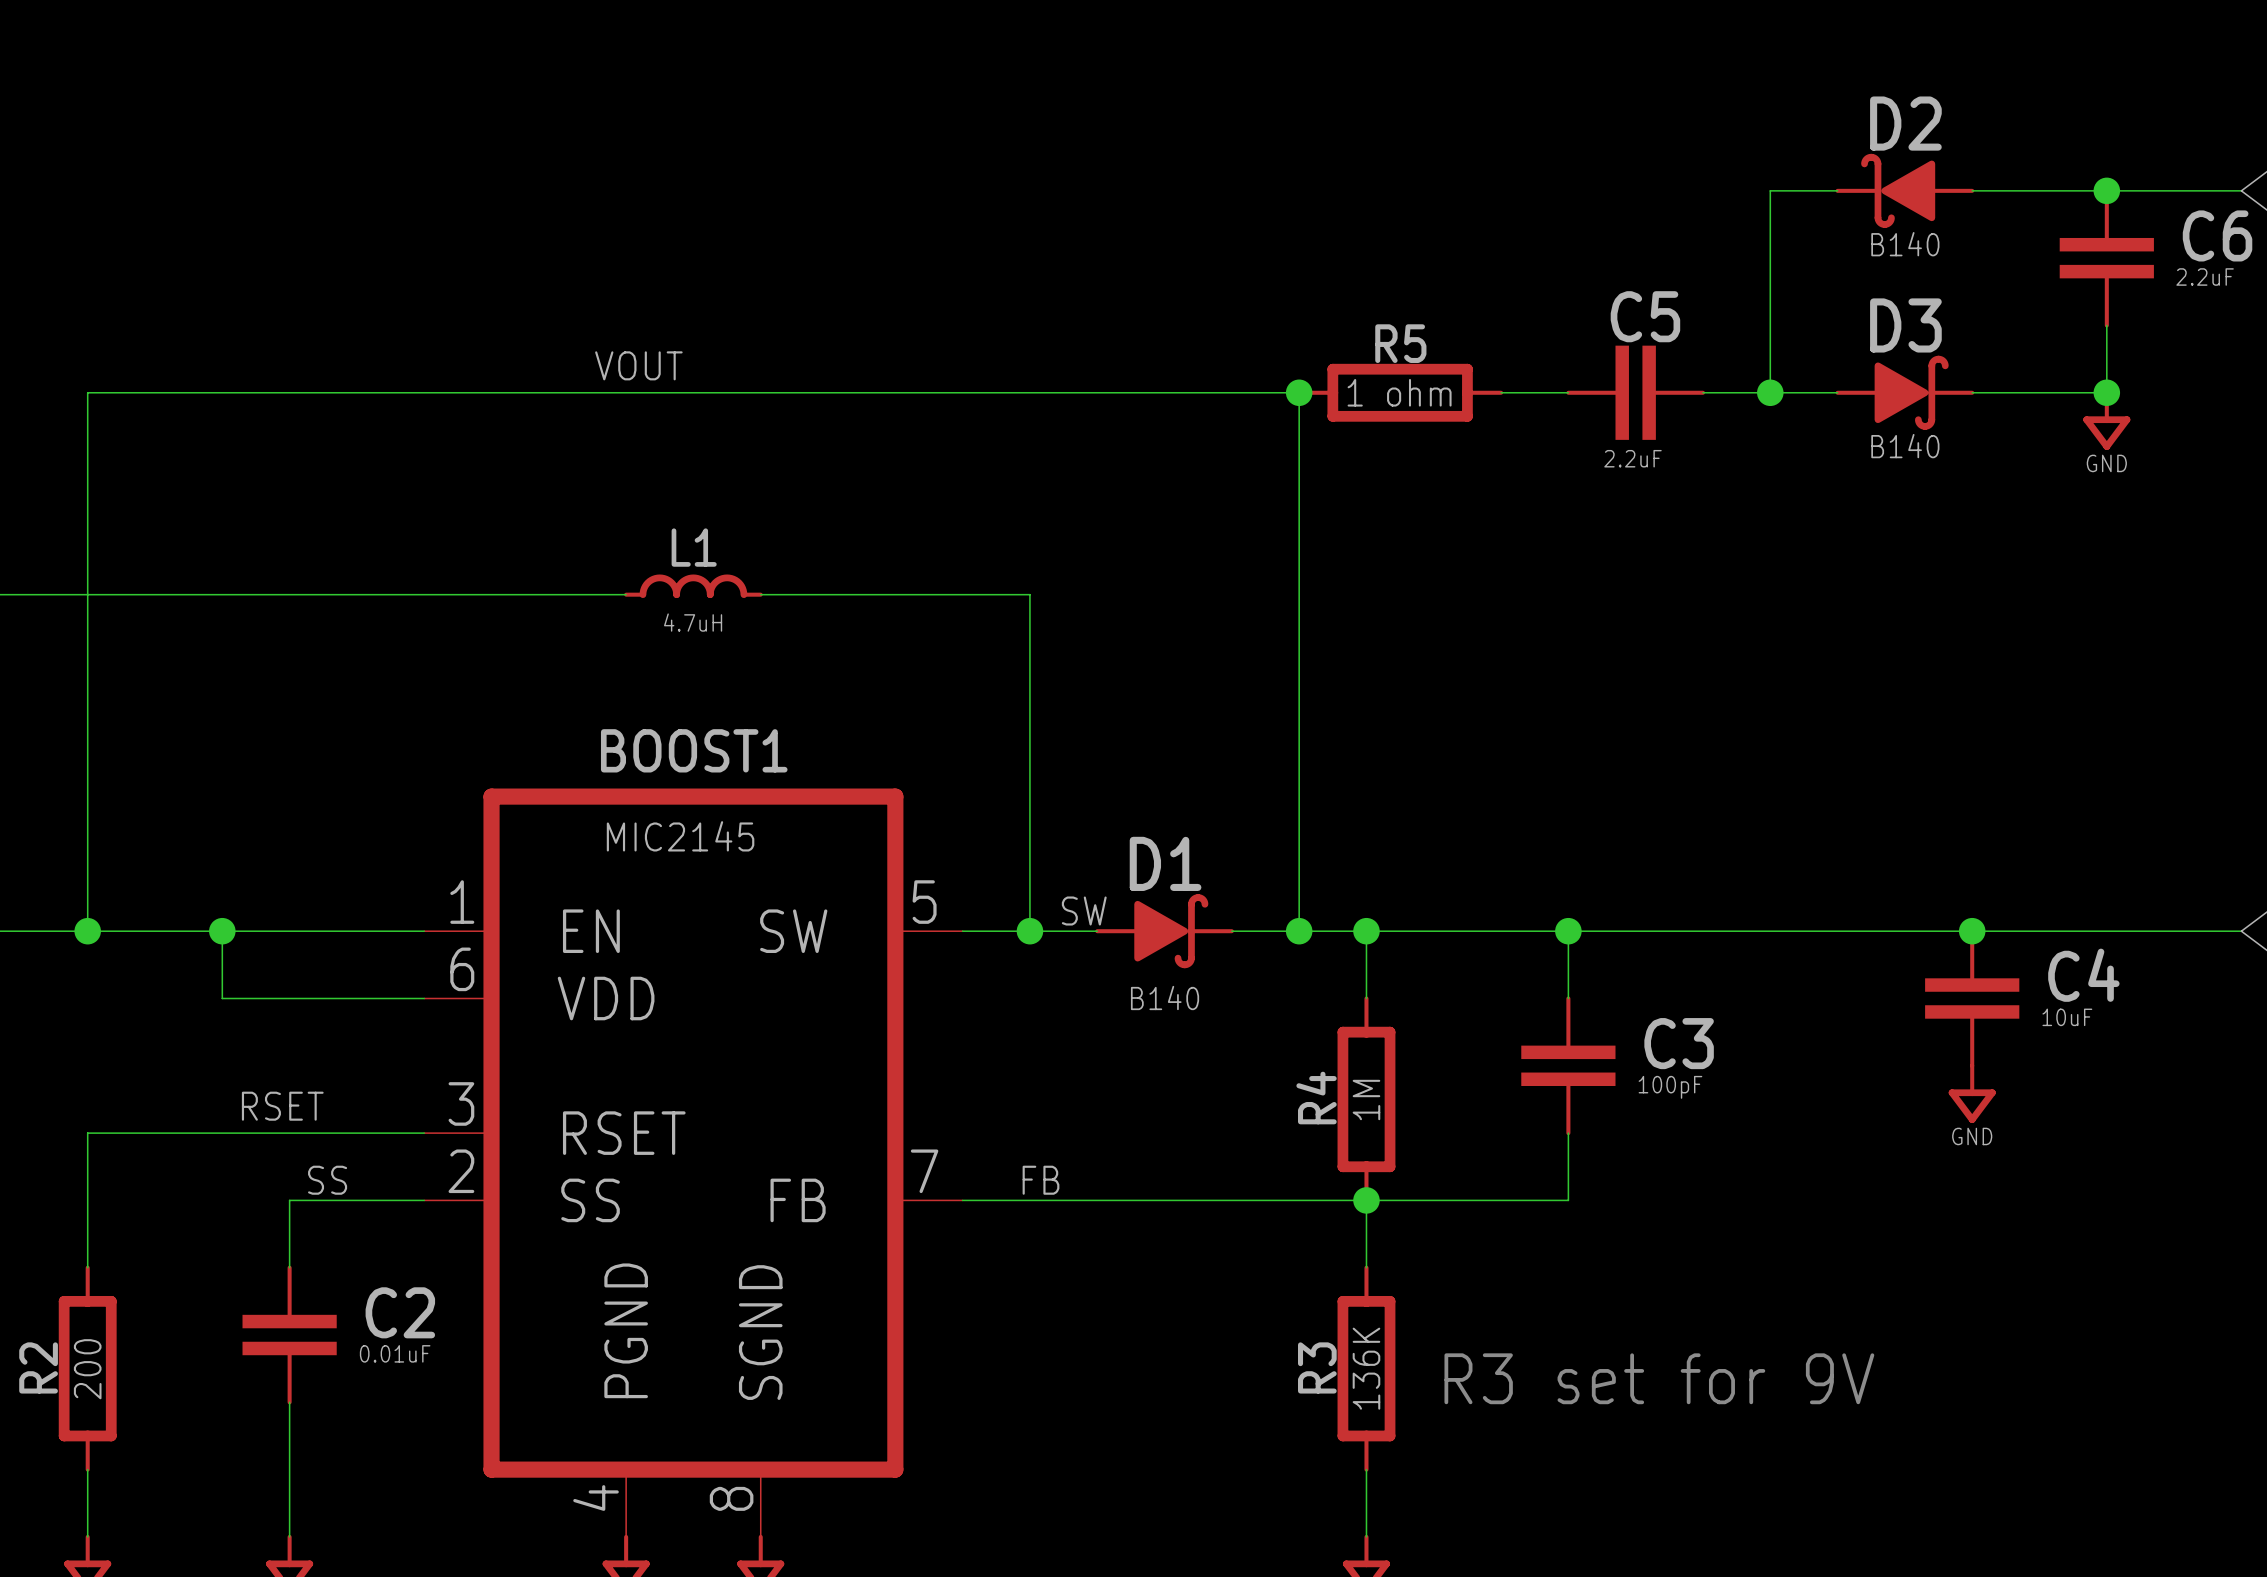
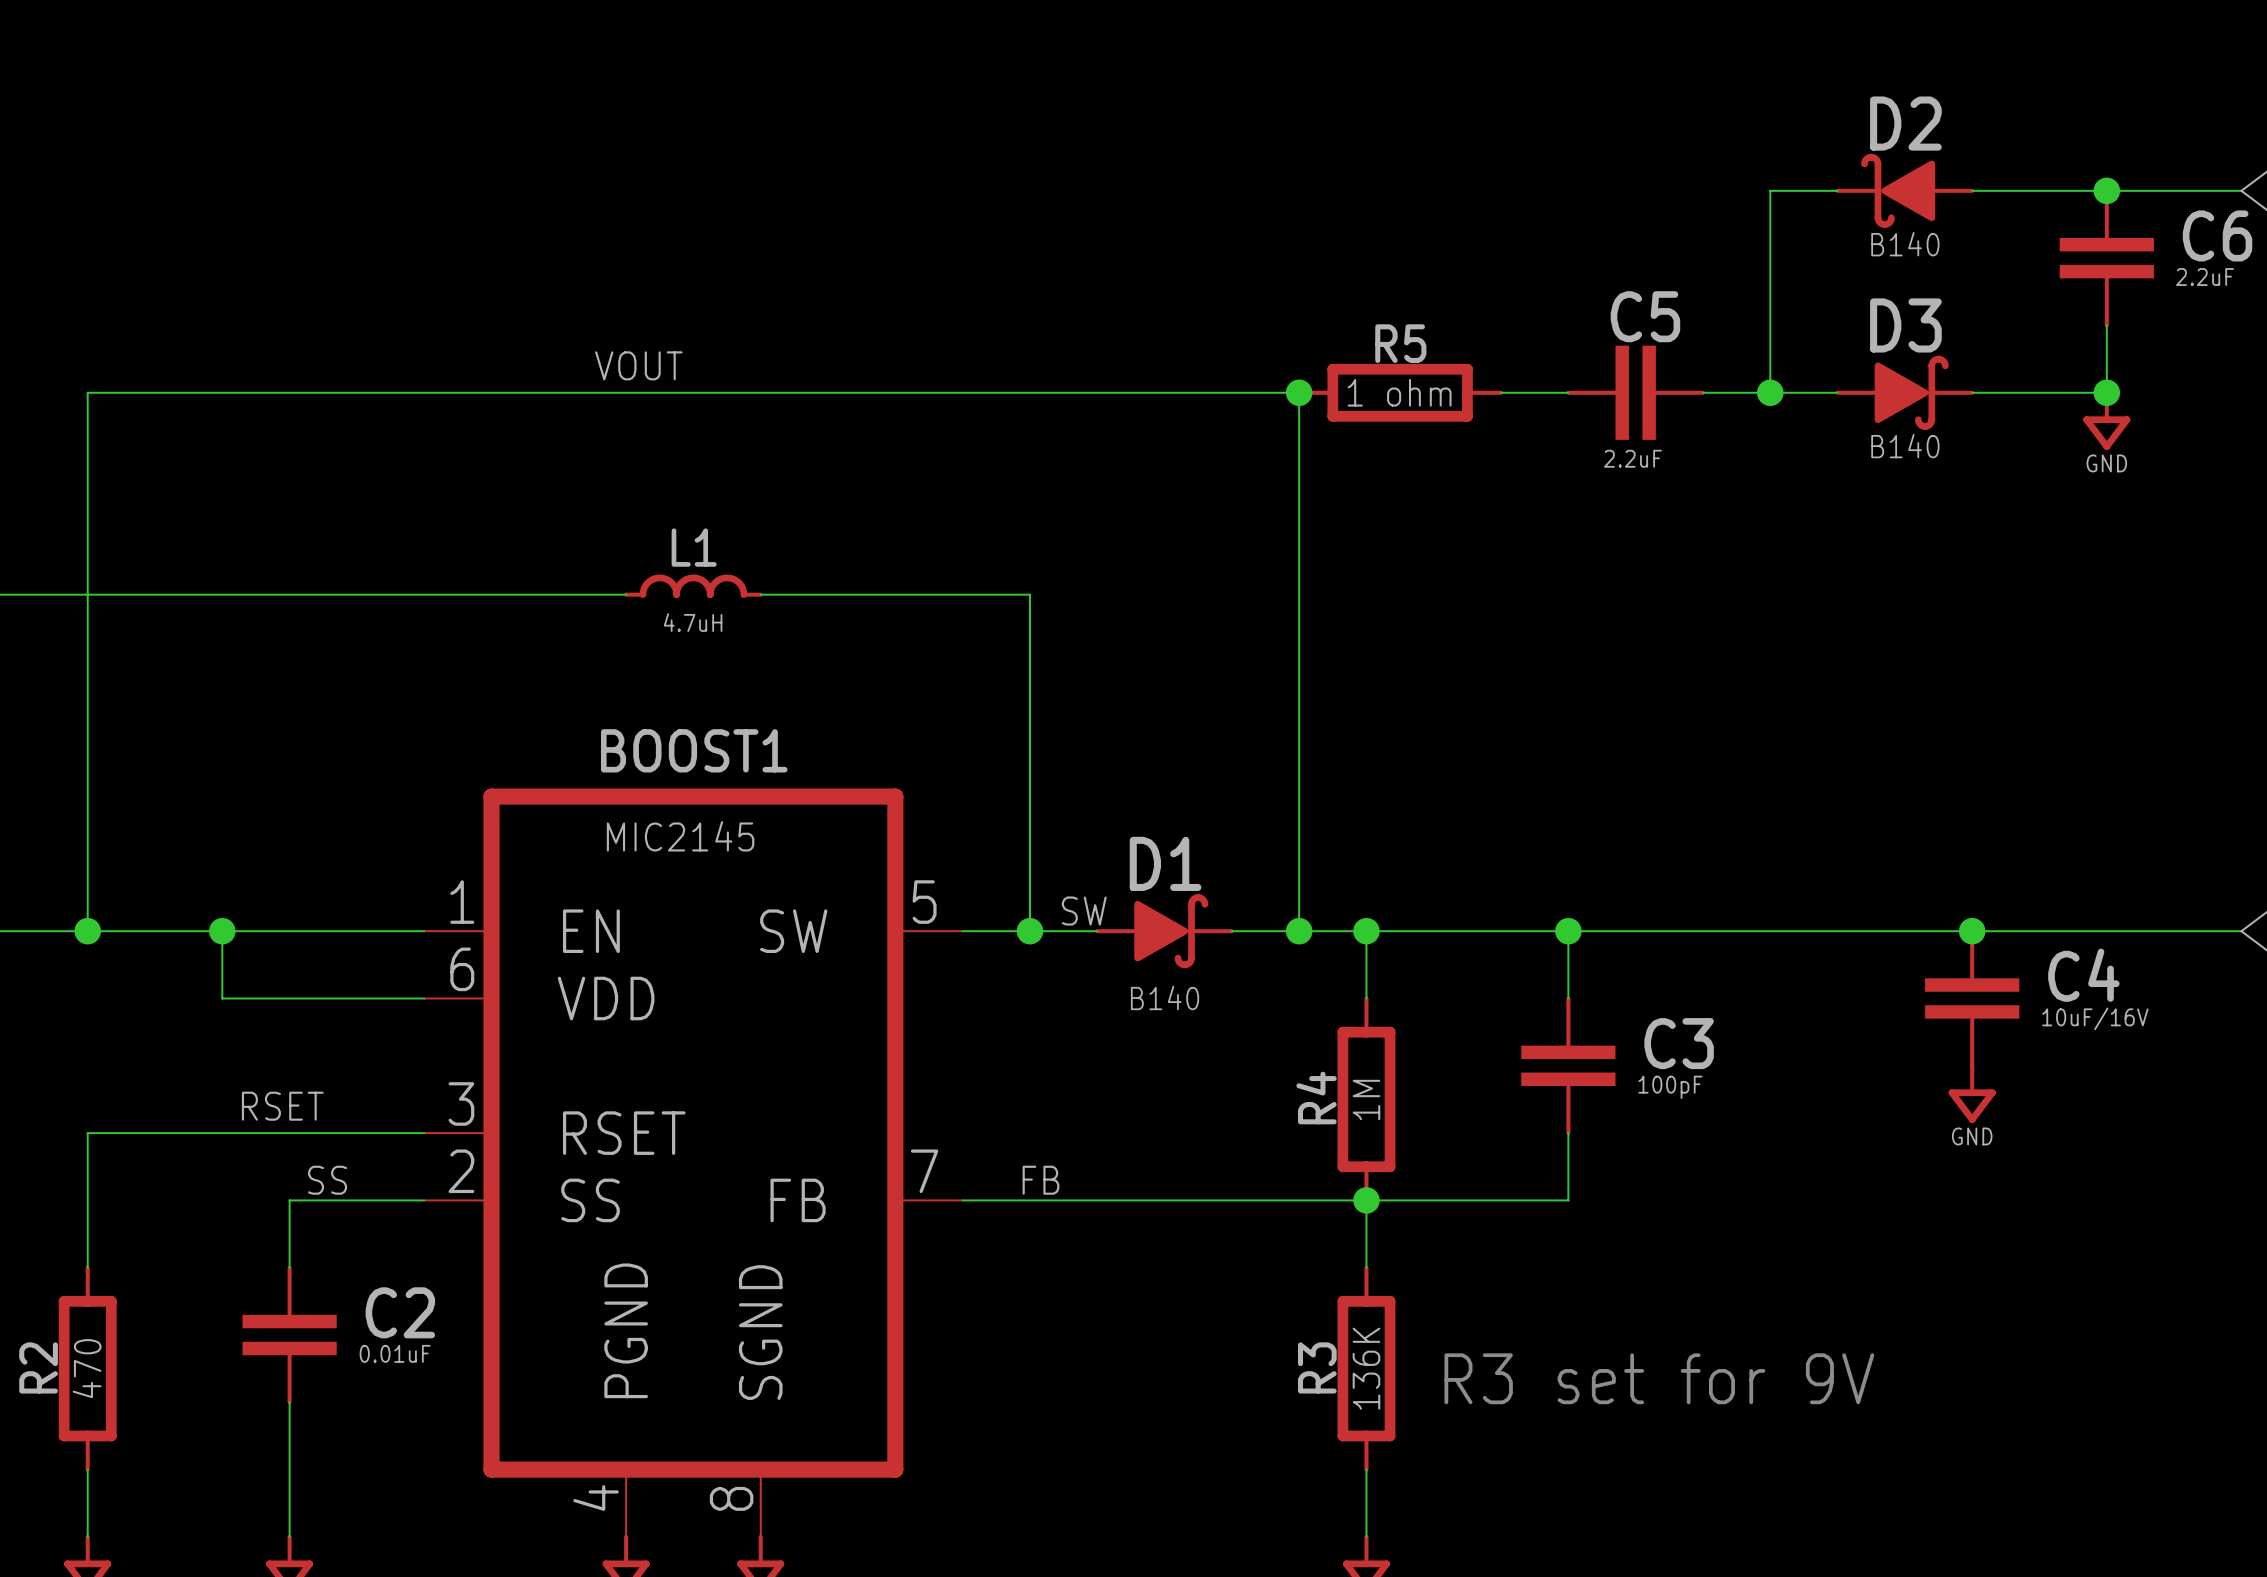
C4 value: 10uF (2067, 1017) -> 10uF/16V (2095, 1018)
R2 value: 200 (87, 1369) -> 470 (87, 1368)

